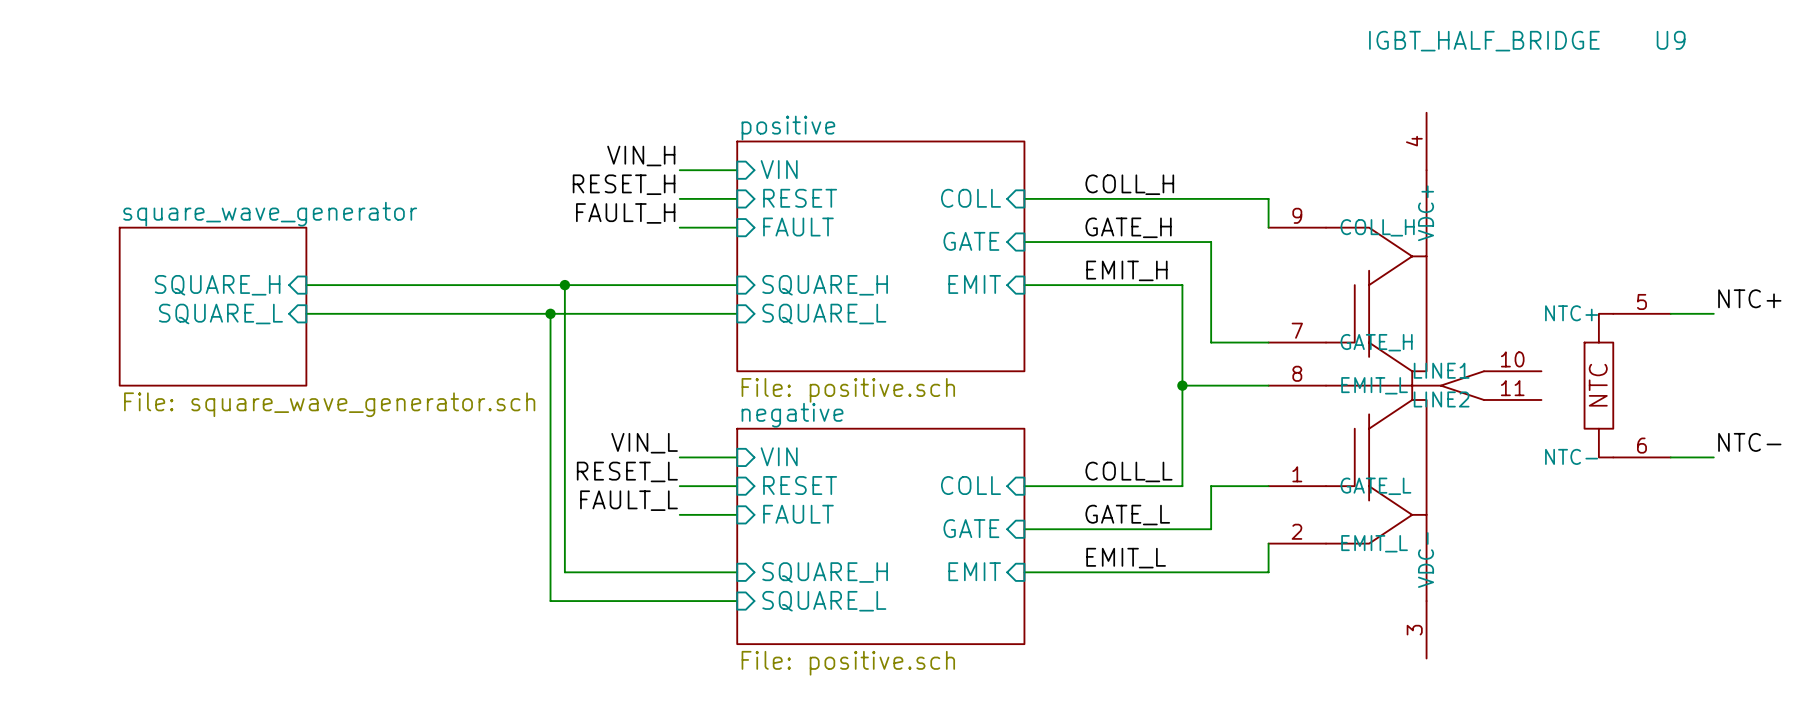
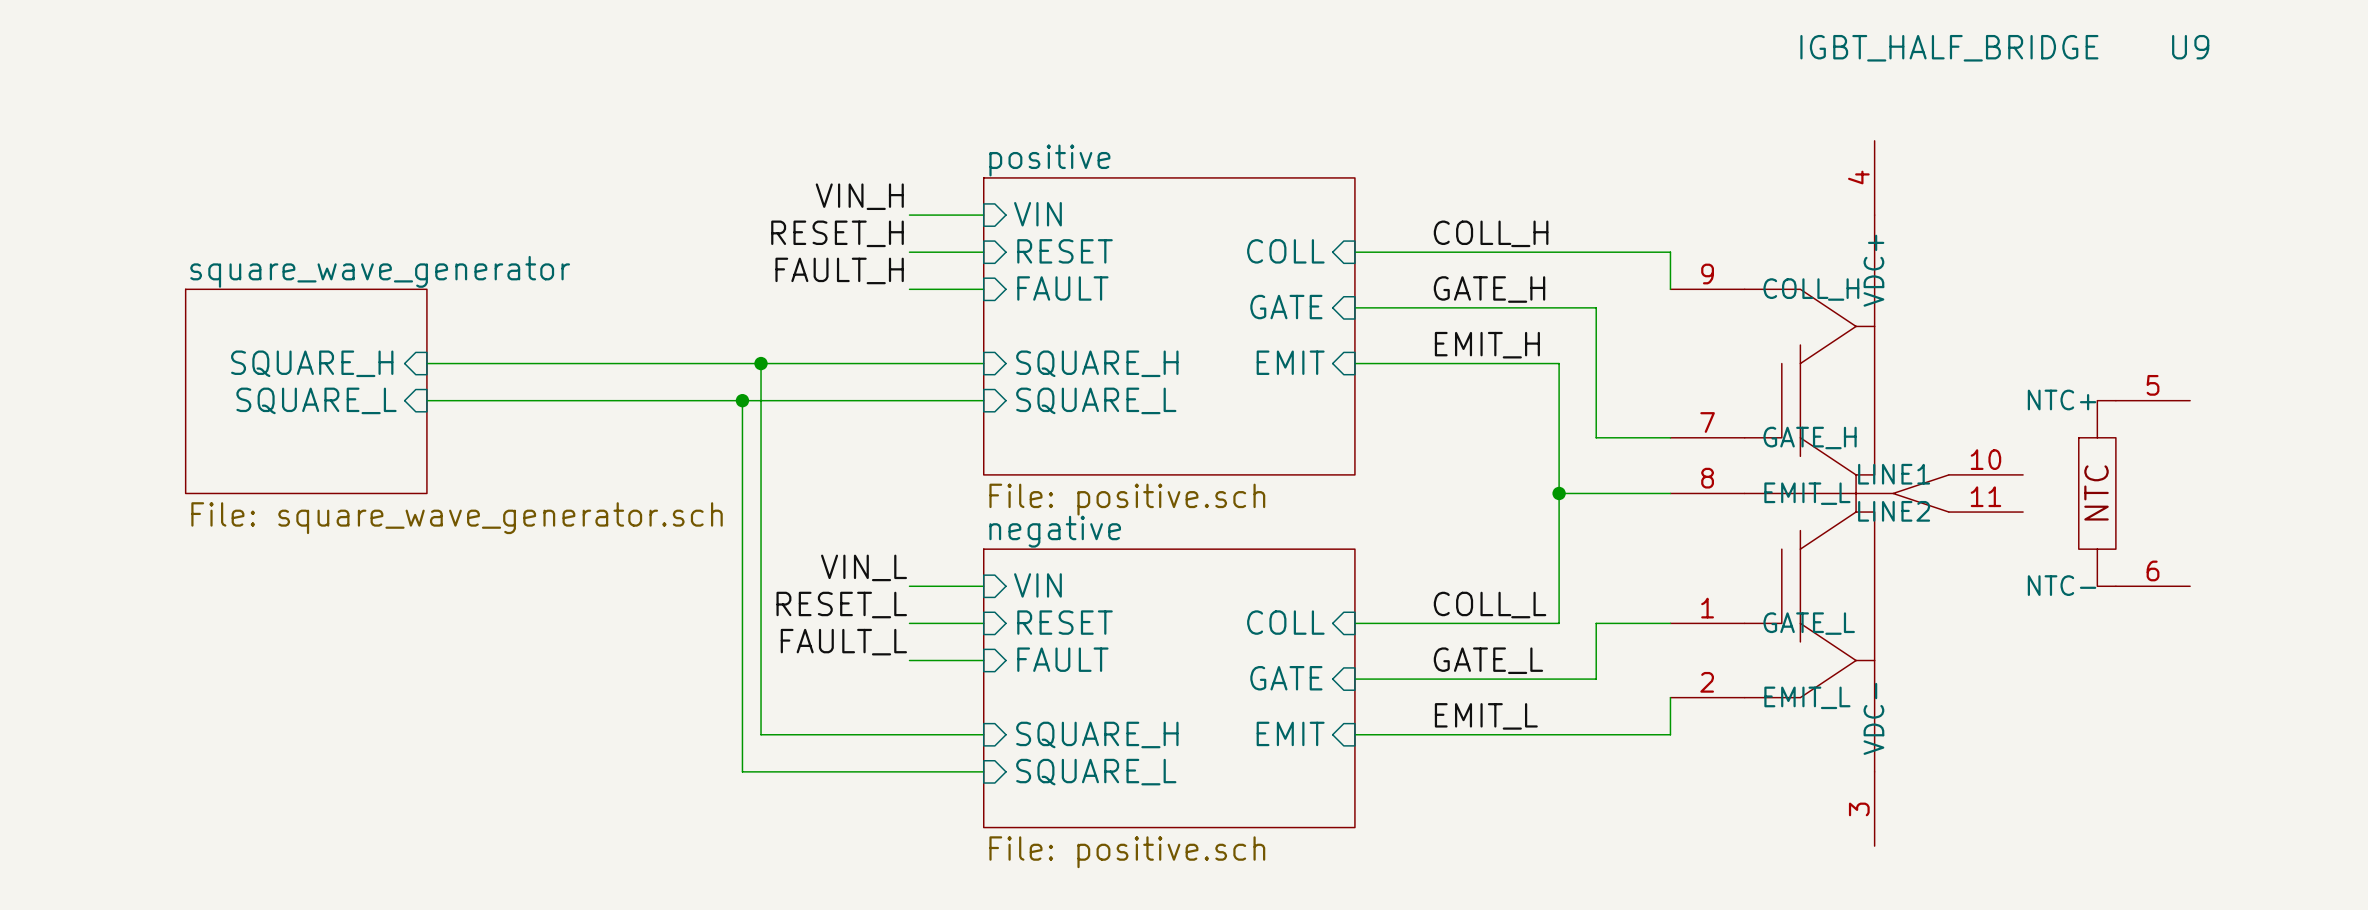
label: NTC+ (1749, 298) -> none
wire: (1670, 313) (1713, 313) -> none
label: NTC- (1749, 442) -> none
wire: (1670, 457) (1713, 457) -> none

